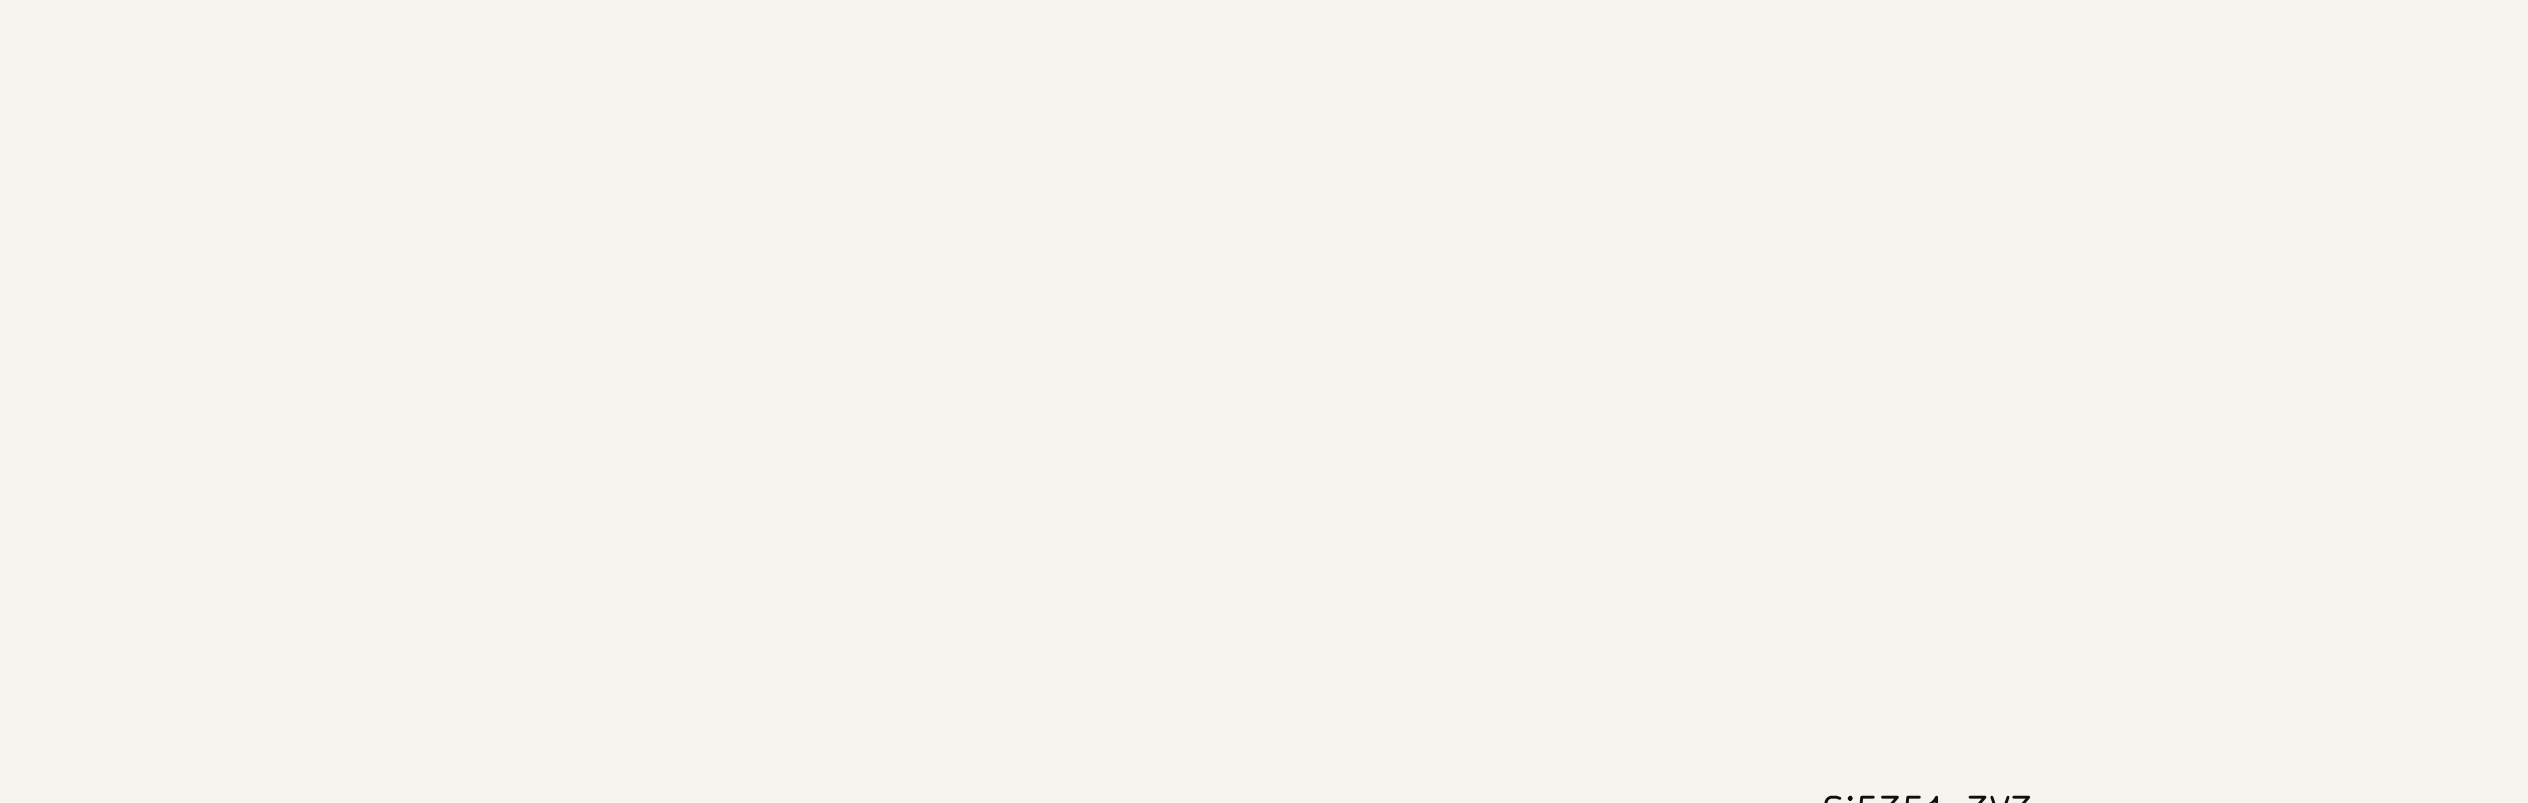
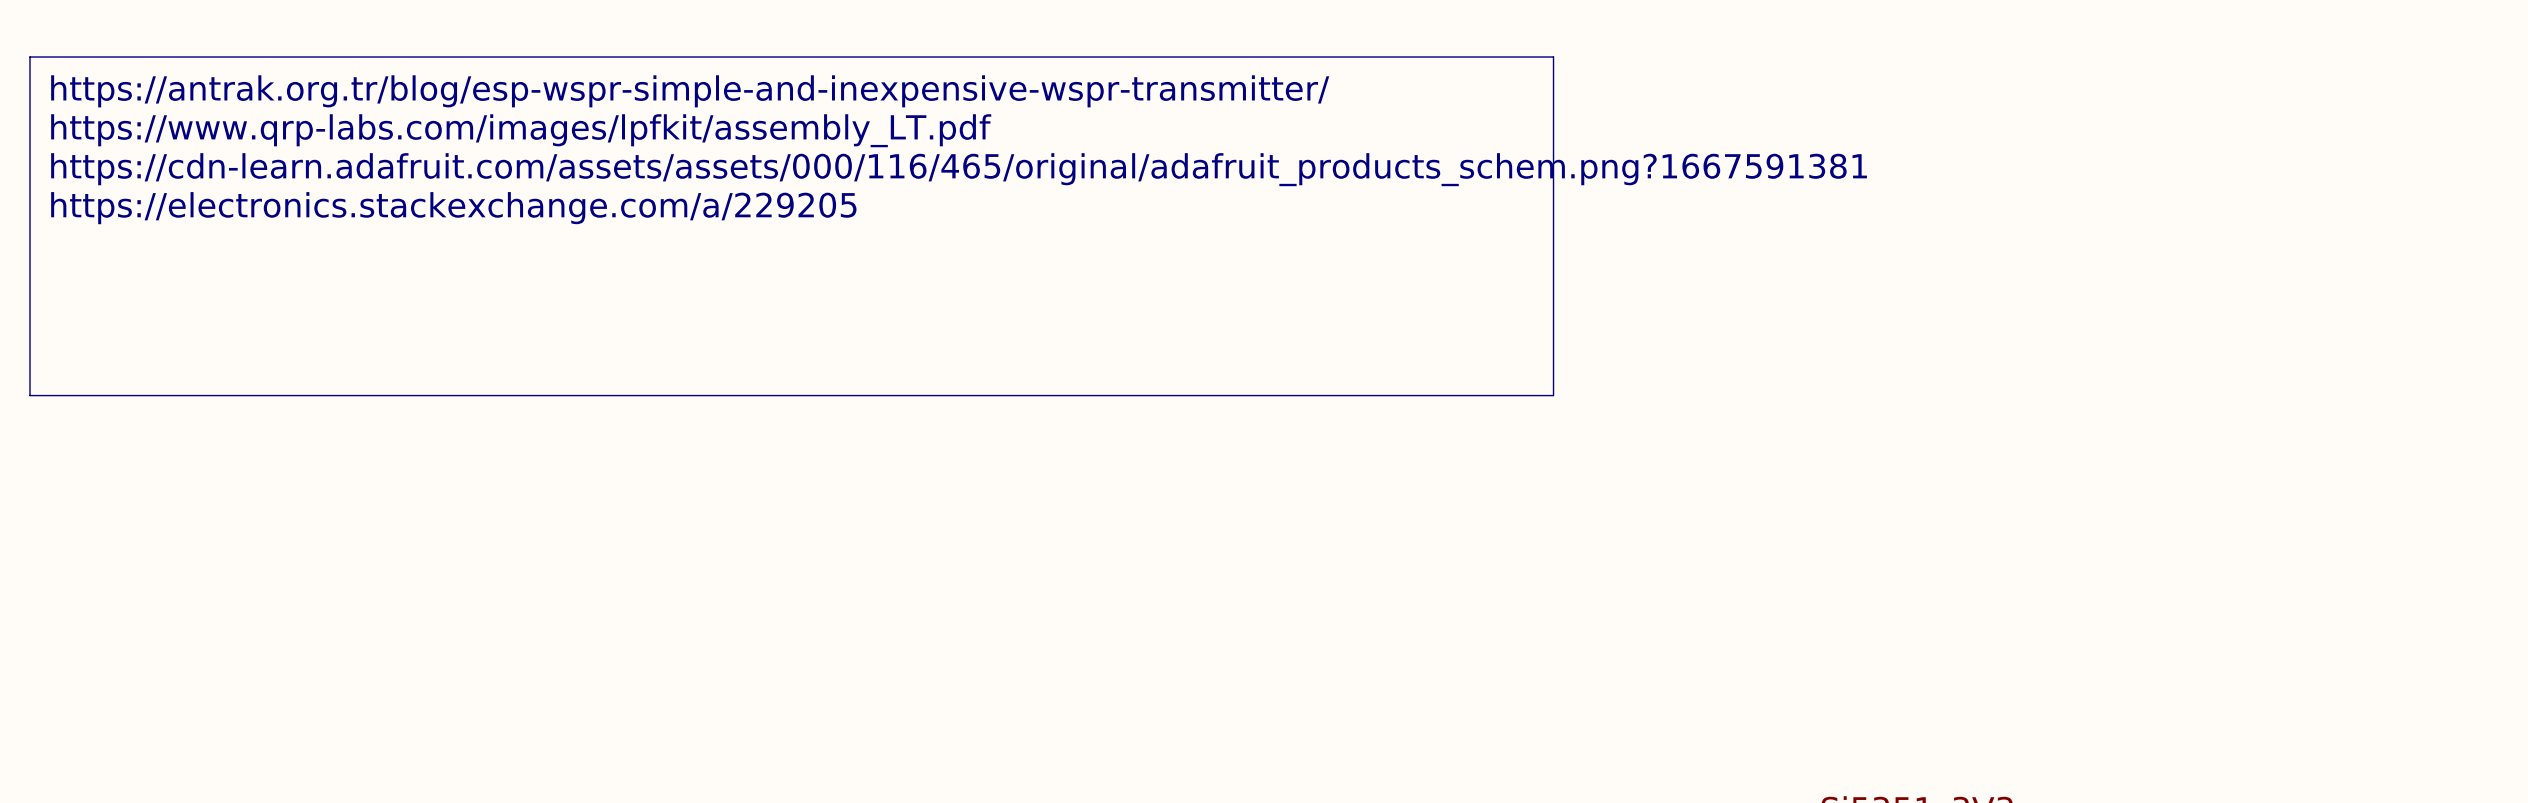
line: none -> (29, 57) (1553, 57) (1553, 395) (29, 395) (29, 57)
text: none -> https://antrak.org.tr/blog/esp-wspr-simple-and-inexpensive-wspr-transmitter/ (690, 91)
text: none -> https://www.qrp-labs.com/images/lpfkit/assembly_LT.pdf (521, 130)
text: none -> https://cdn-learn.adafruit.com/assets/assets/000/116/465/original/adafruit_products_schem.png?1667591381 (959, 169)
text: none -> https://electronics.stackexchange.com/a/229205 (453, 208)

